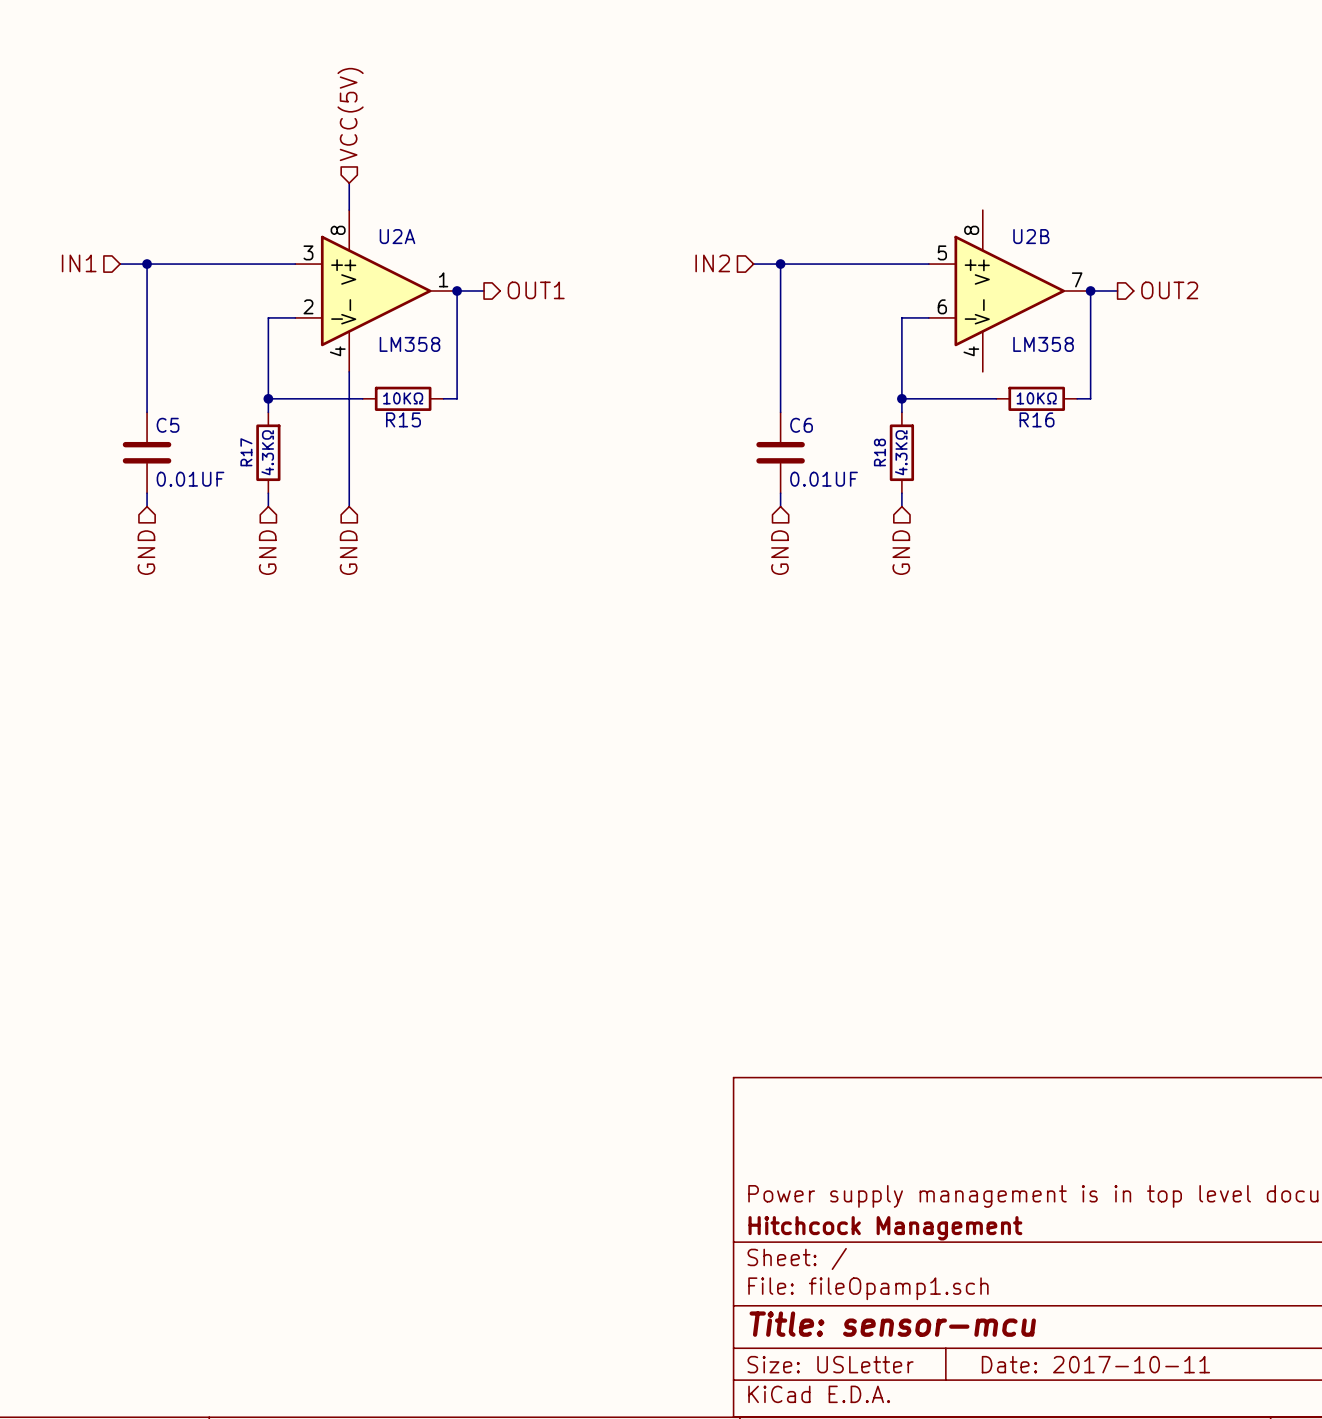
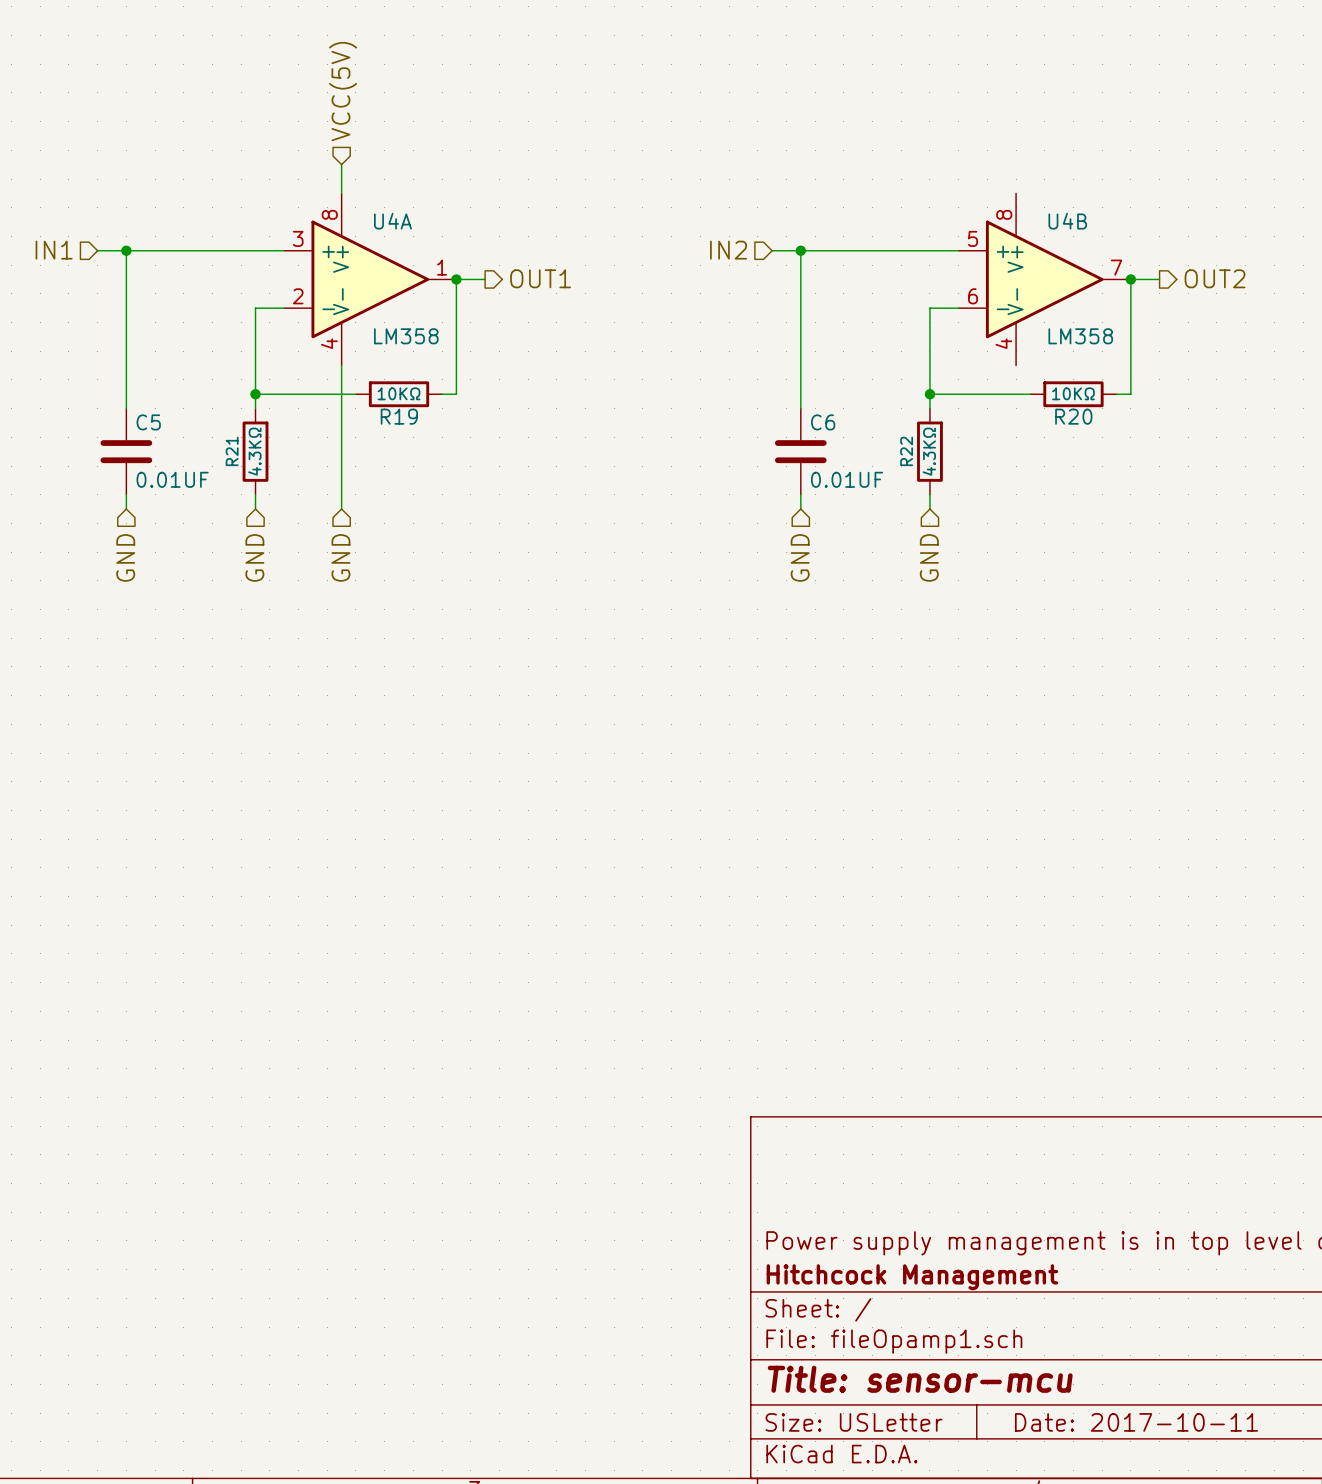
U2A name: U2A (397, 236) -> U4A (392, 221)
U2B name: U2B (1031, 236) -> U4B (1067, 221)
R15 name: R15 (403, 419) -> R19 (399, 416)
R16 name: R16 (1037, 419) -> R20 (1073, 416)
R17 name: R17 (246, 452) -> R21 (232, 451)
R18 name: R18 (879, 452) -> R22 (906, 451)

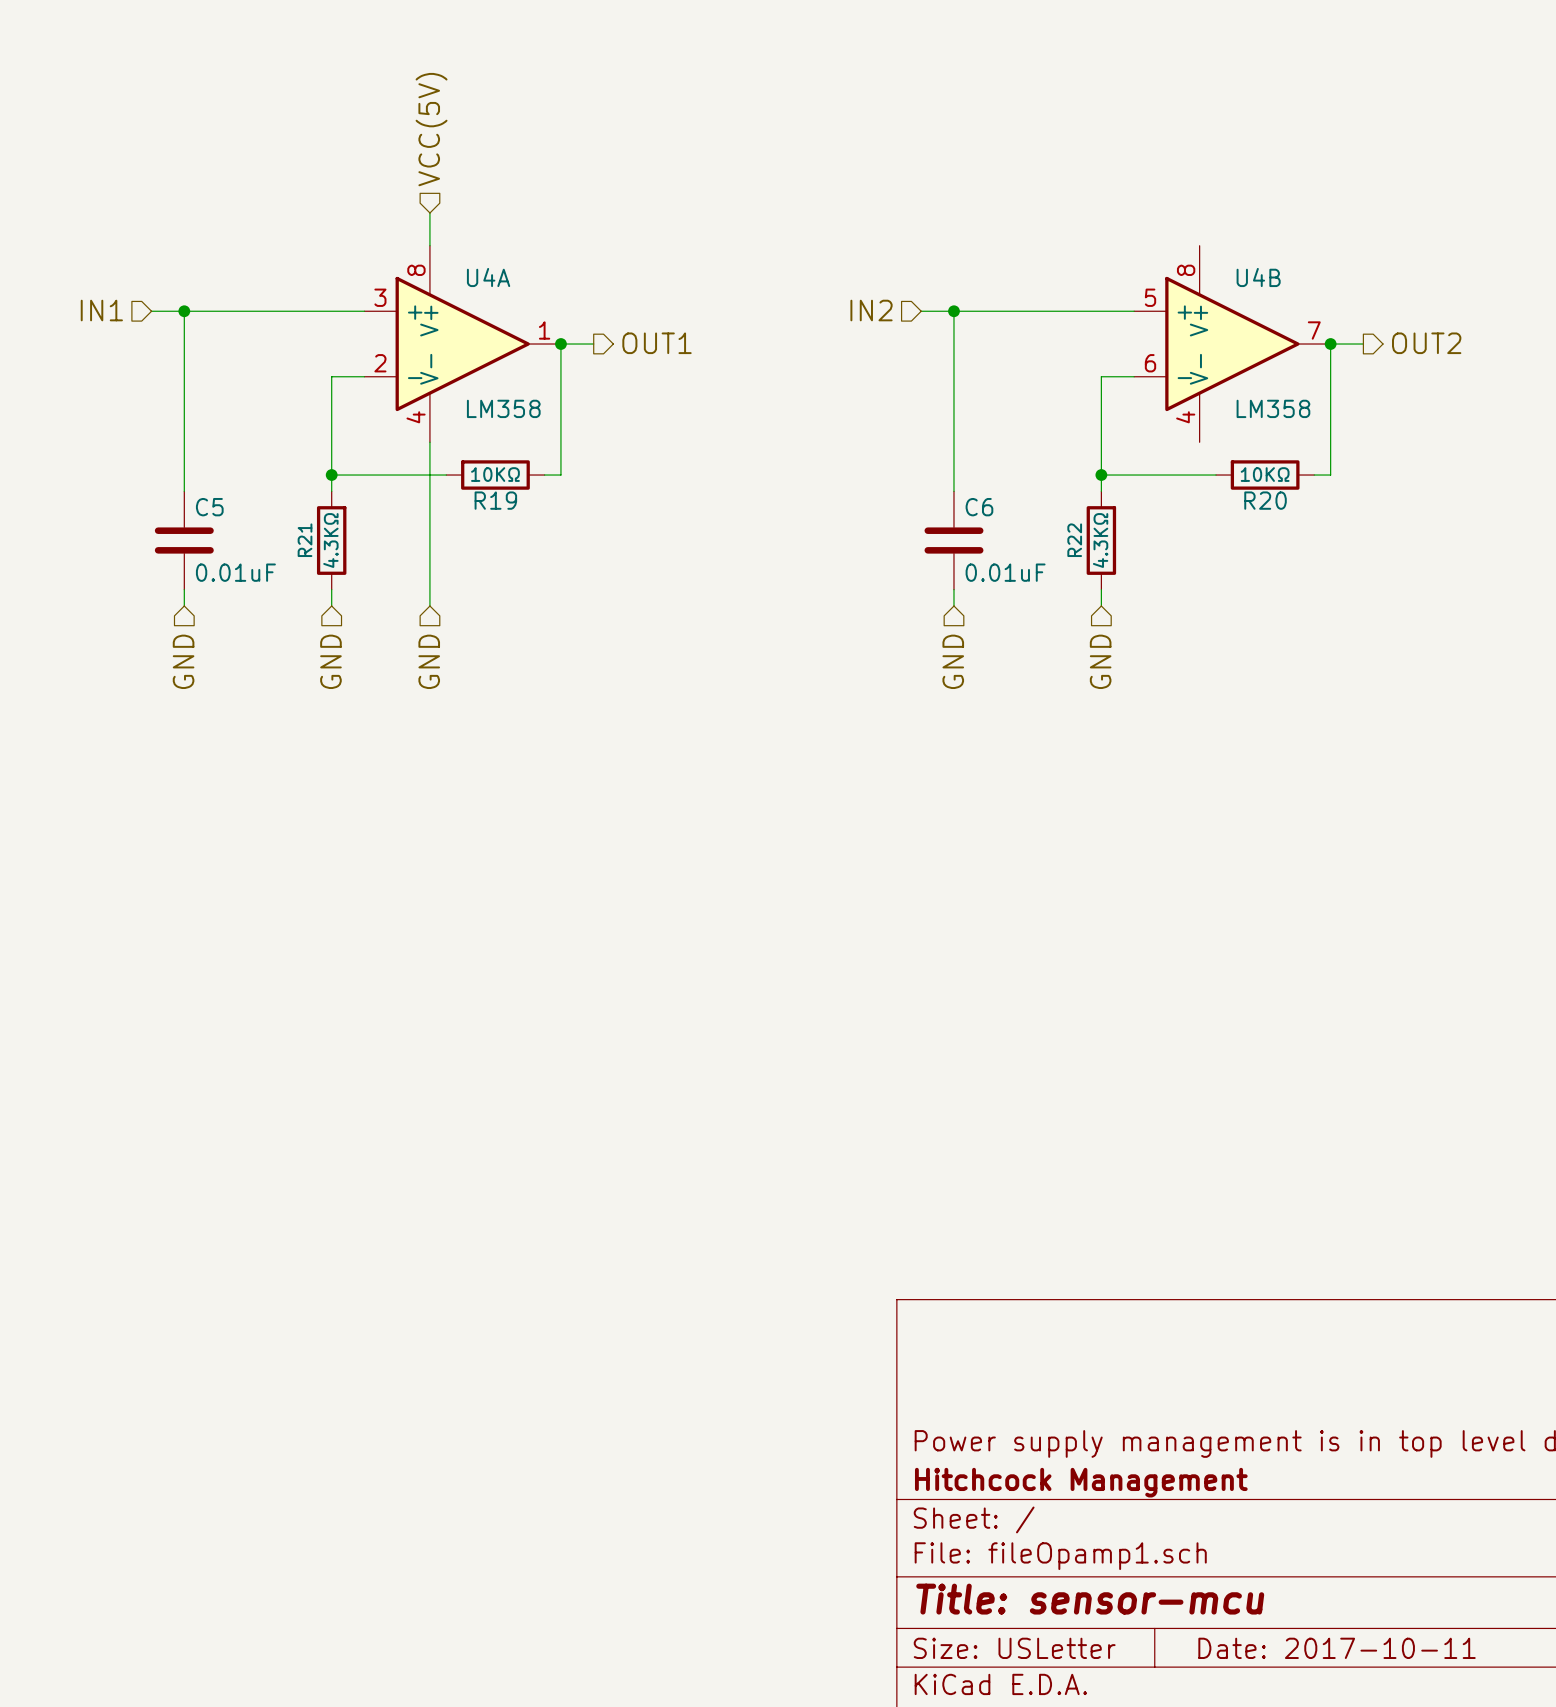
C5 value: 0.01UF (172, 479) -> 0.01uF (235, 572)
C6 value: 0.01UF (847, 479) -> 0.01uF (1005, 572)

